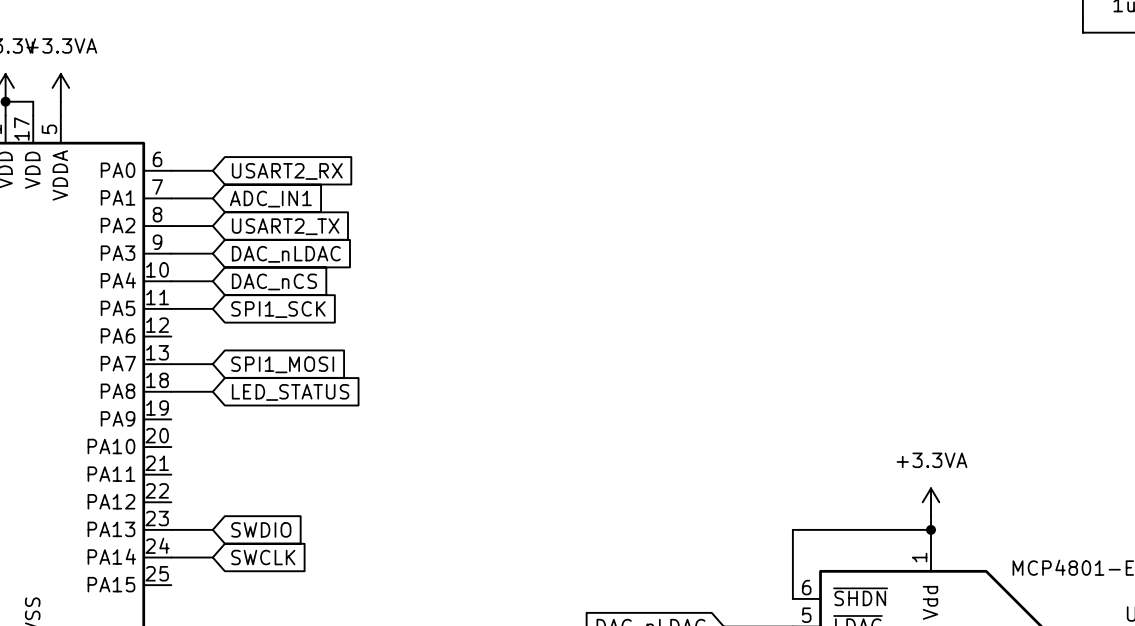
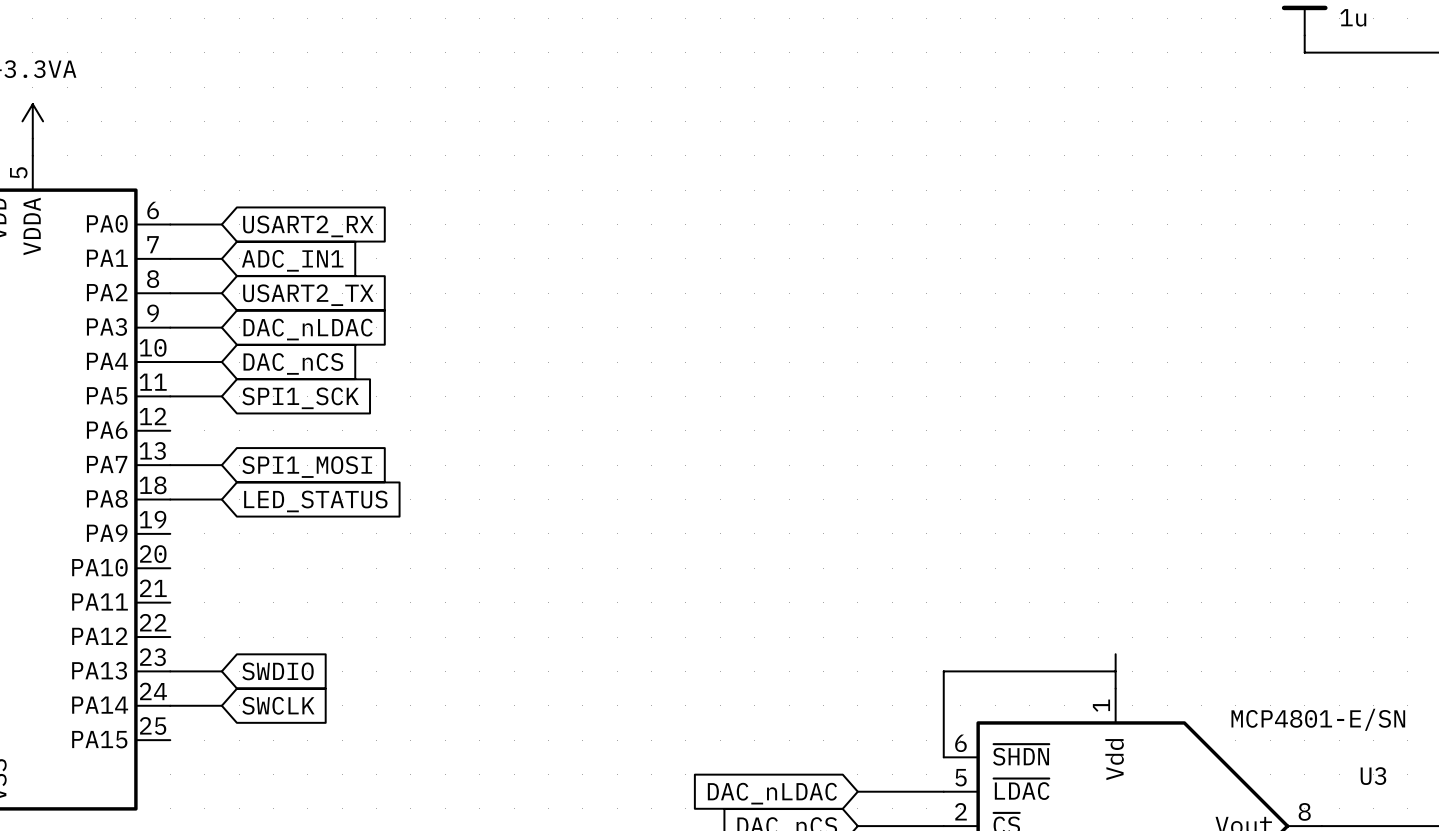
power symbol: +3.3VA (931, 502) -> none
junction: (931, 529) -> none

